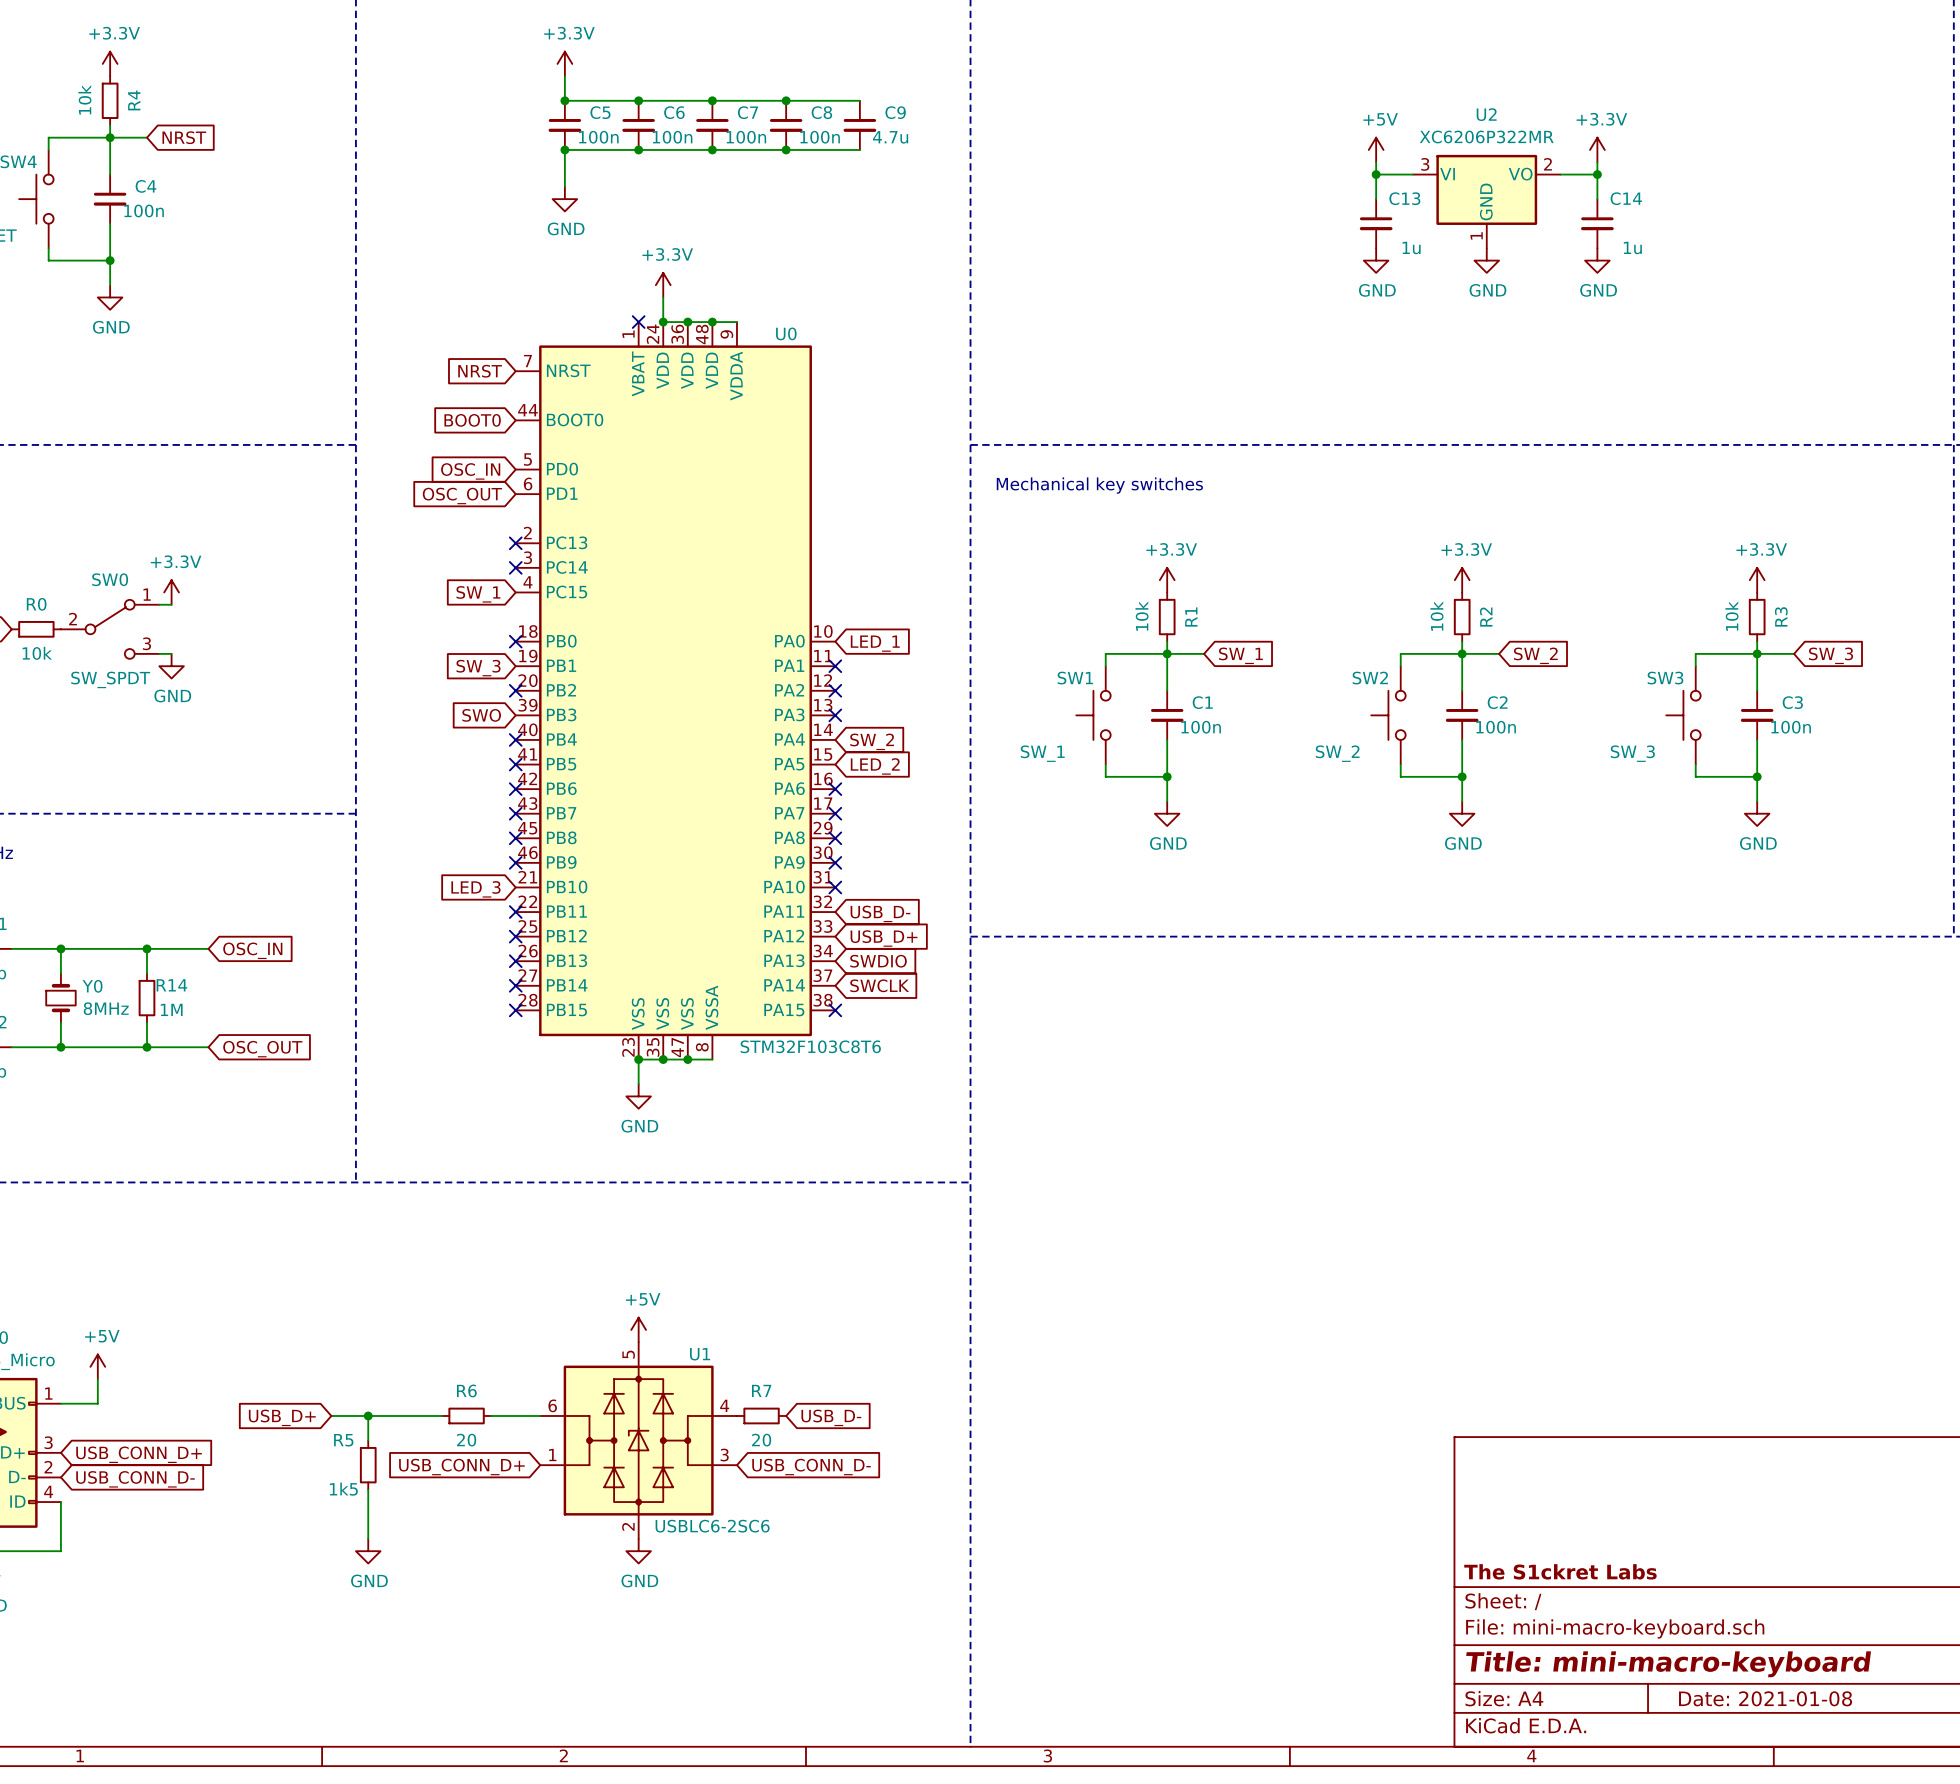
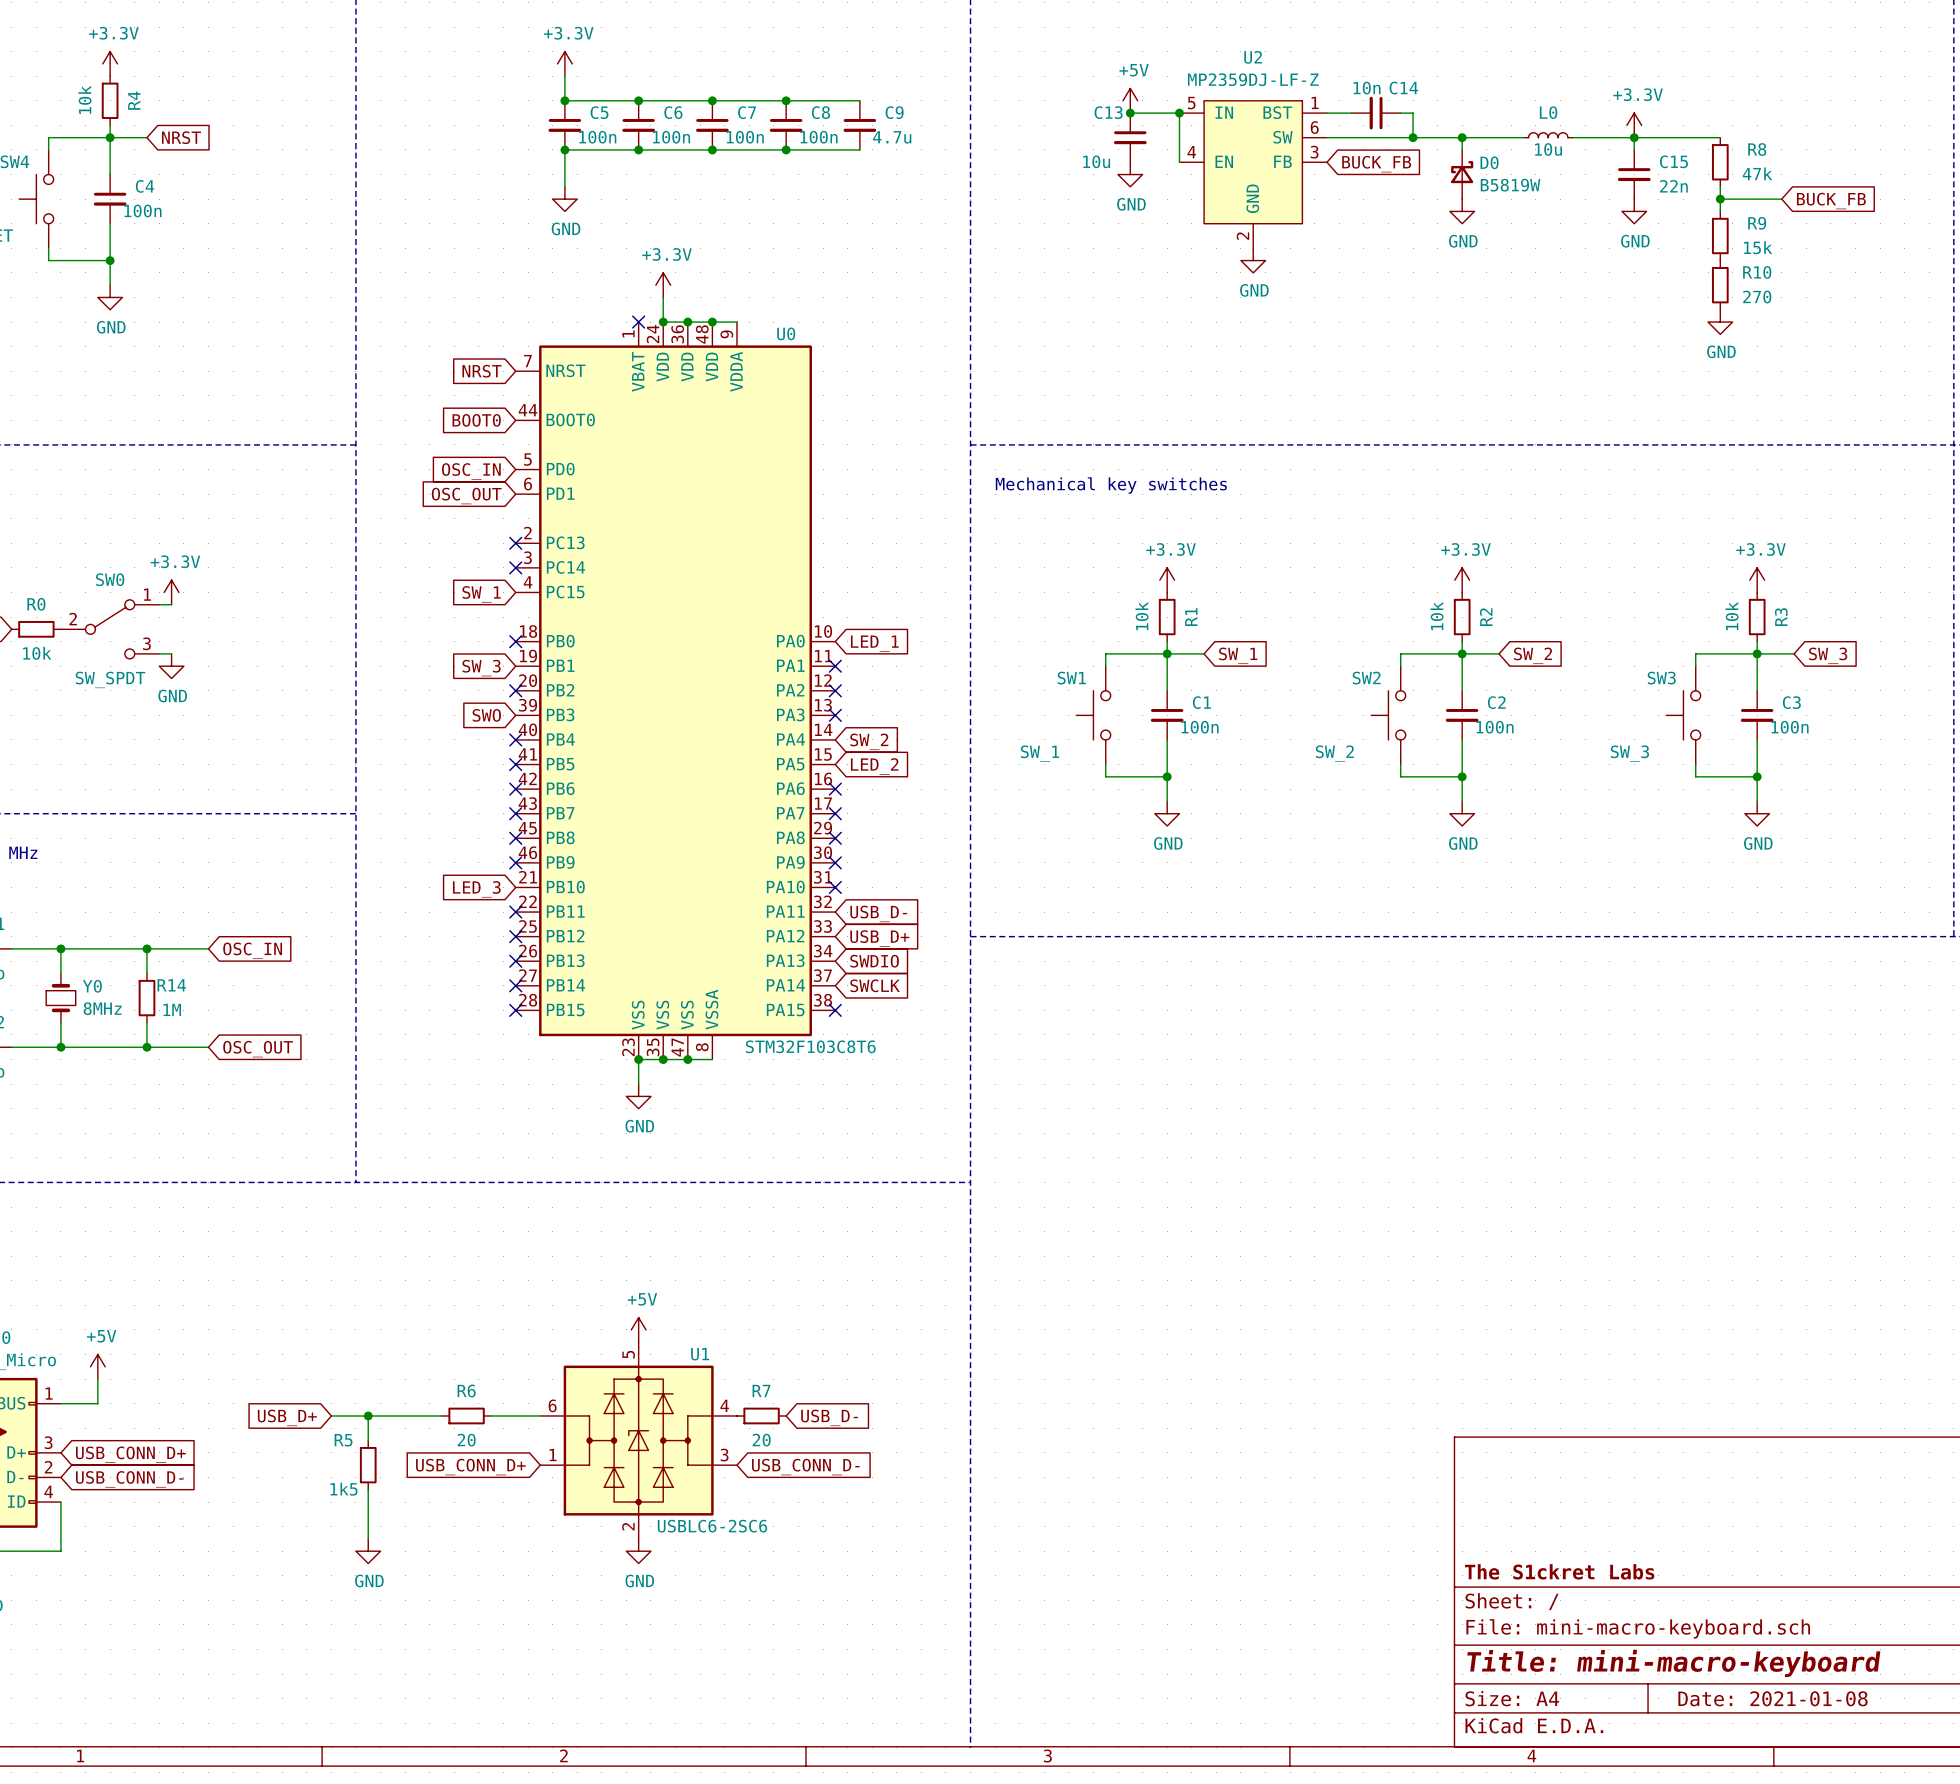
power symbol: none -> +5V (1130, 100)
wire: none -> (1130, 113) (1179, 113) (1179, 162)
junction: none -> (1130, 113)
junction: none -> (1179, 113)
wire: none -> (1326, 113) (1351, 113)
wire: none -> (1400, 113) (1413, 113) (1413, 137)
U2 name position: U2 (1486, 114) -> U2 (1253, 57)
L0: none -> 10u (1548, 135)
U2 value: XC6206P322MR (1486, 136) -> MP2359DJ-LF-Z (1253, 79)
wire: none -> (1326, 137) (1523, 137)
junction: none -> (1413, 137)
wire: none -> (1462, 137) (1462, 149)
junction: none -> (1462, 137)
wire: none -> (1572, 137) (1720, 137)
wire: none -> (1634, 137) (1634, 149)
power symbol: +5V (1376, 149) -> none
power symbol position: +3.3V (1597, 149) -> +3.3V (1634, 125)
U2 symbol: [1413, 154, 1561, 249] -> [1179, 100, 1327, 249]
wire: (1376, 162) (1376, 199) -> none
wire: (1597, 162) (1597, 199) -> none
R8: none -> 47k (1720, 162)
global label: none -> BUCK_FB (1376, 164)
power symbol: none -> GND (1130, 174)
junction: (1376, 174) -> none
D0: none -> B5819W (1462, 174)
wire: (1560, 174) (1597, 174) -> none
junction position: (1597, 174) -> (1634, 137)
C15: none -> 22n (1634, 174)
wire: none -> (1720, 186) (1720, 211)
C13 name position: C13 (1404, 198) -> C13 (1108, 112)
wire: none -> (1720, 199) (1781, 199)
junction: none -> (1720, 199)
global label: none -> BUCK_FB (1831, 201)
power symbol: none -> GND (1462, 211)
C13 position: (1376, 223) -> (1130, 137)
C14 rotation: 0° (1597, 223) -> 90° clockwise (1376, 113)
C14 position: (1597, 223) -> (1376, 113)
R9: none -> 15k (1720, 236)
C13 value: 1u (1411, 247) -> 10u (1096, 161)
C14 value: 1u (1632, 247) -> 10n (1367, 88)
power symbol: none -> GND (1253, 260)
power symbol: GND (1376, 260) -> none
power symbol: GND (1486, 260) -> none
power symbol position: GND (1597, 260) -> GND (1634, 211)
R10: none -> 270 (1720, 285)
power symbol: none -> GND (1720, 322)

